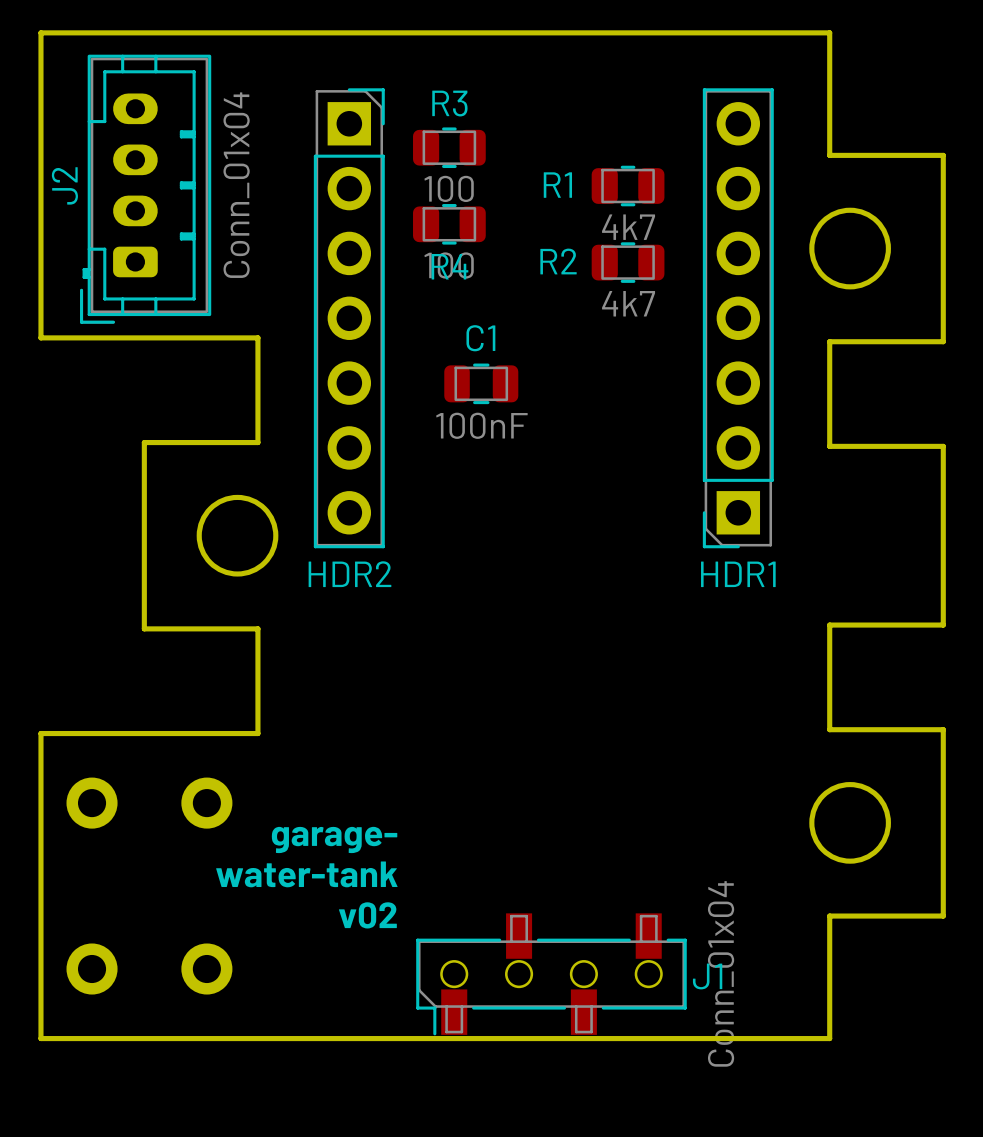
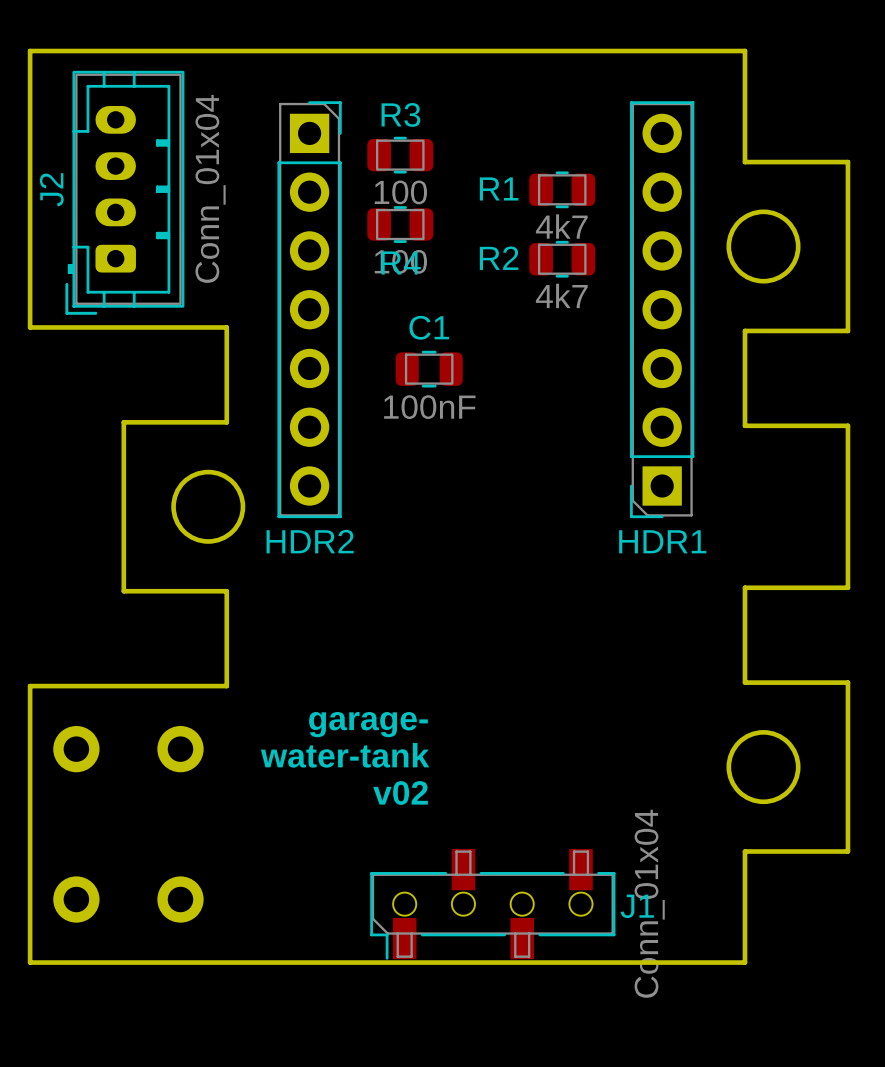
text position: garage- (334, 839) -> garage- (368, 724)
text position: water-tank (306, 874) -> water-tank (345, 755)
J1 footprint: [416, 913, 687, 1036] -> [370, 849, 616, 960]
text position: v02 (367, 915) -> v02 (400, 793)

